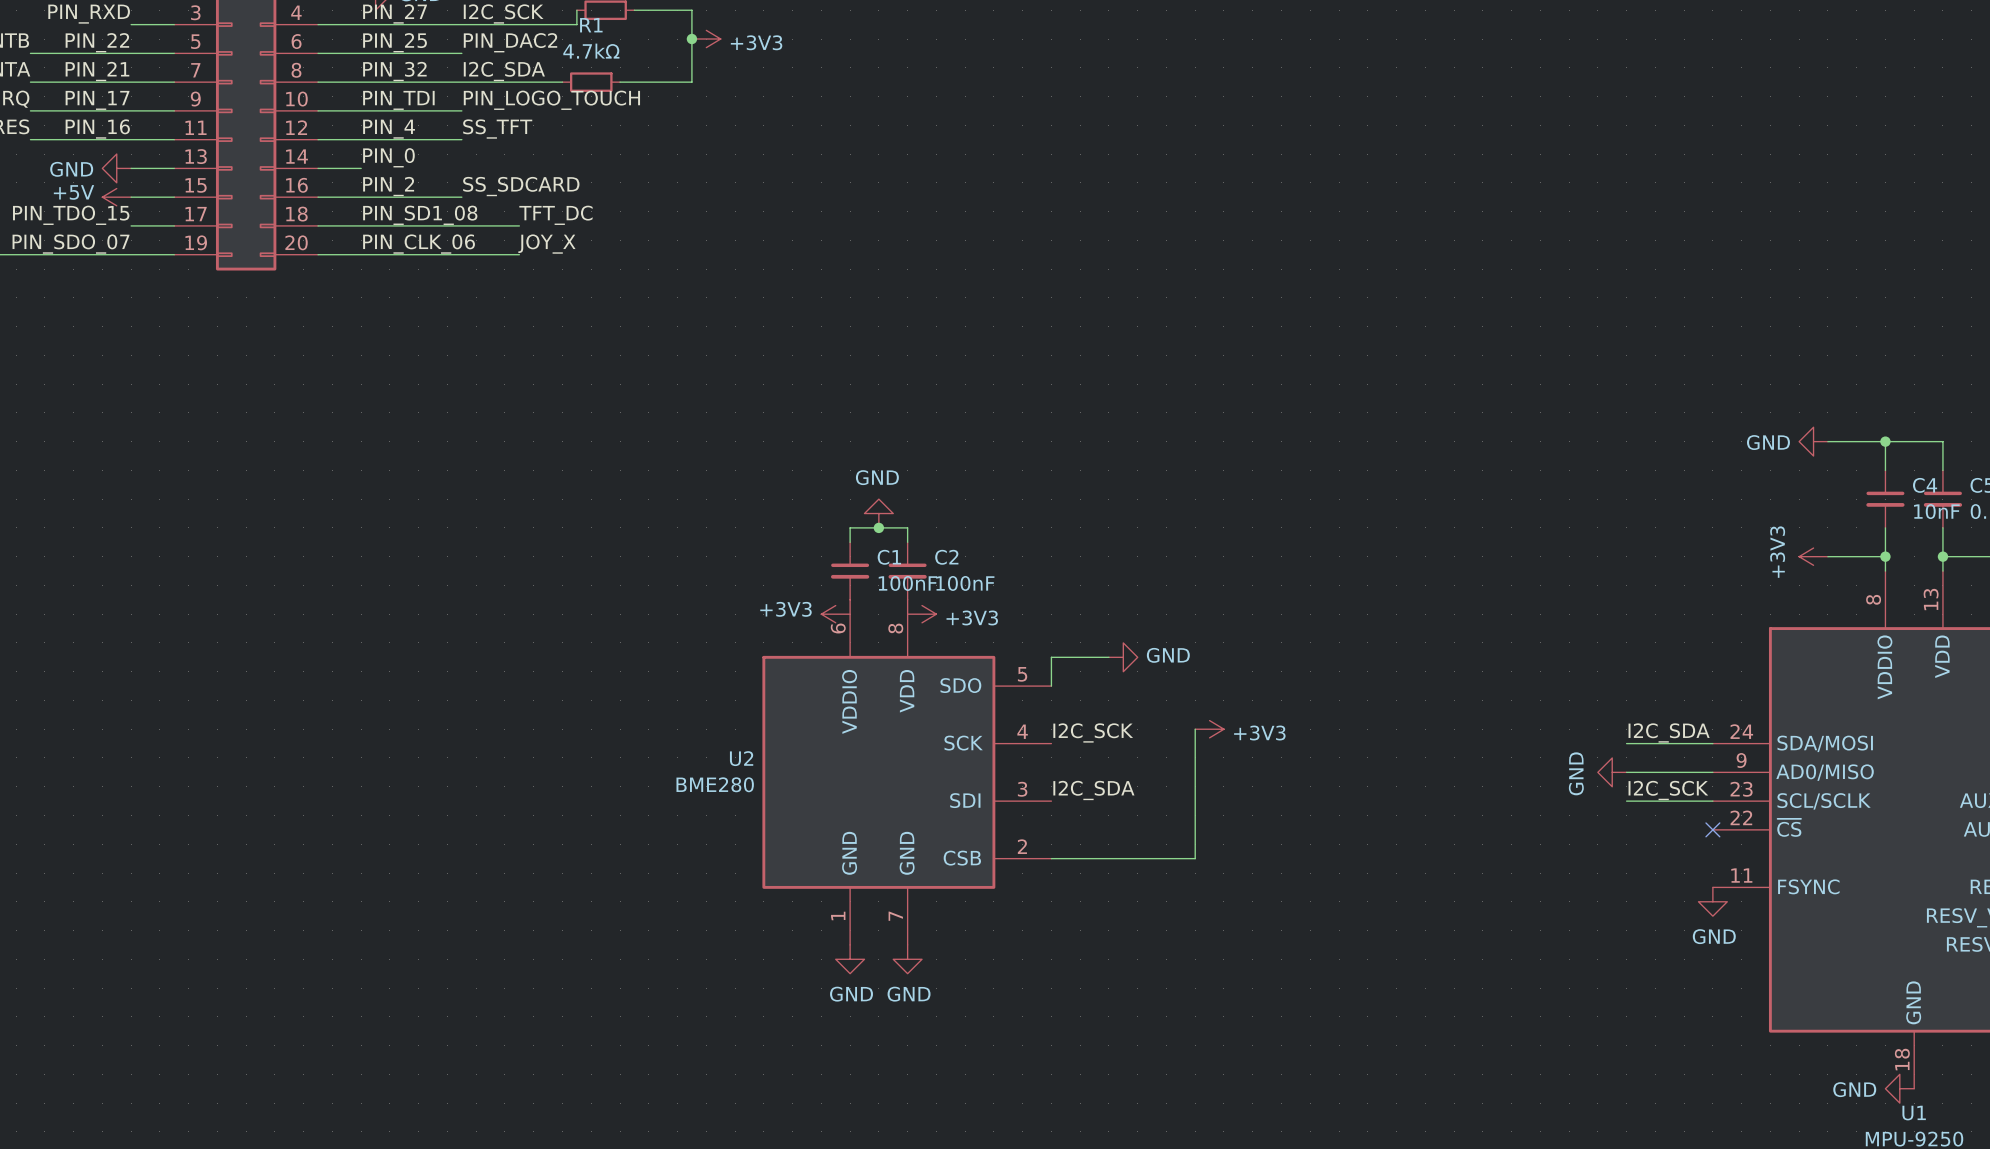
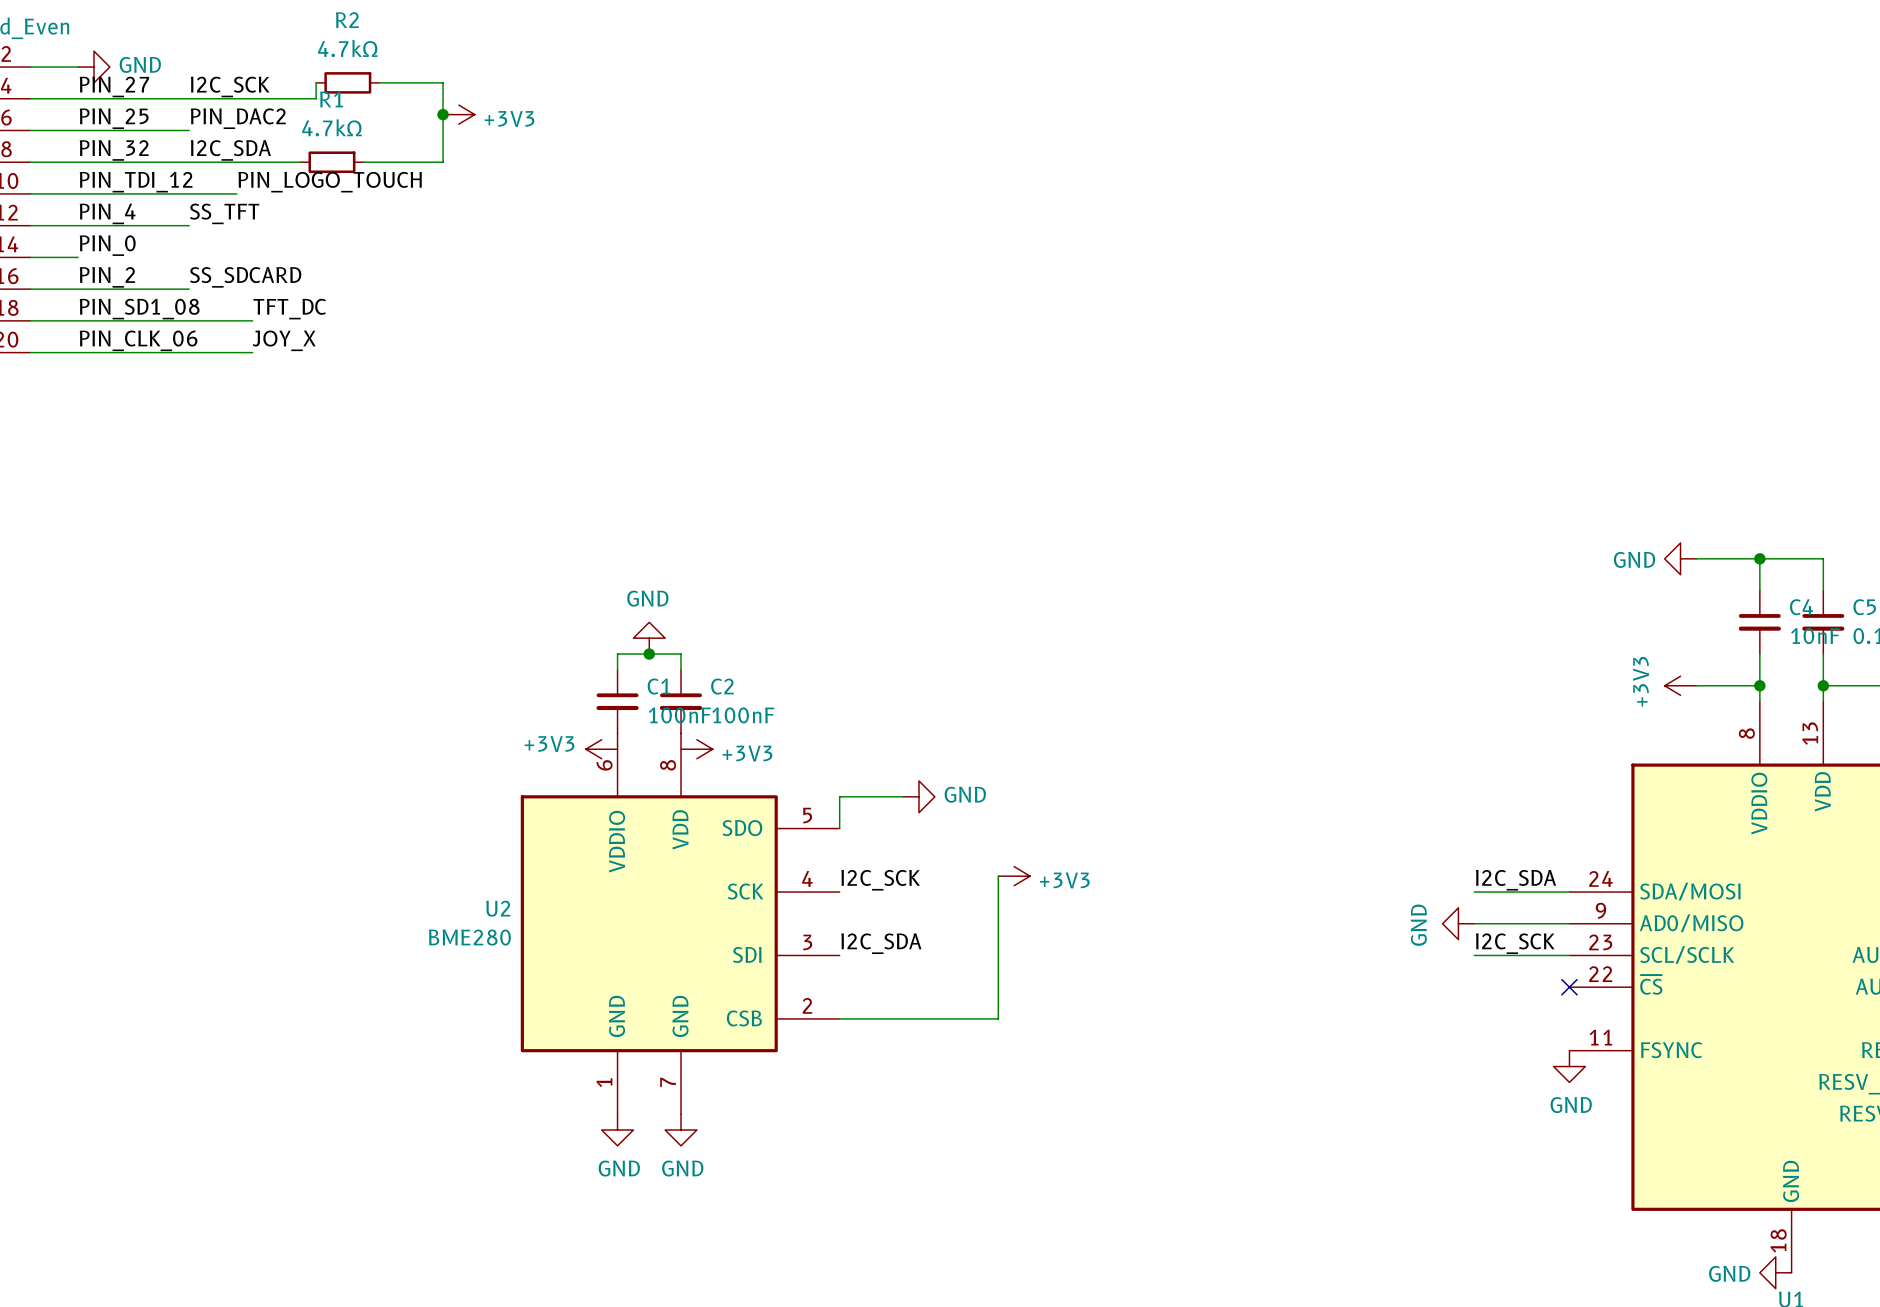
label: PIN_TDI (398, 100) -> PIN_TDI_12 (136, 182)
label position: PIN_LOGO_TOUCH (551, 100) -> PIN_LOGO_TOUCH (330, 182)
wire: none -> (189, 193) (236, 193)

